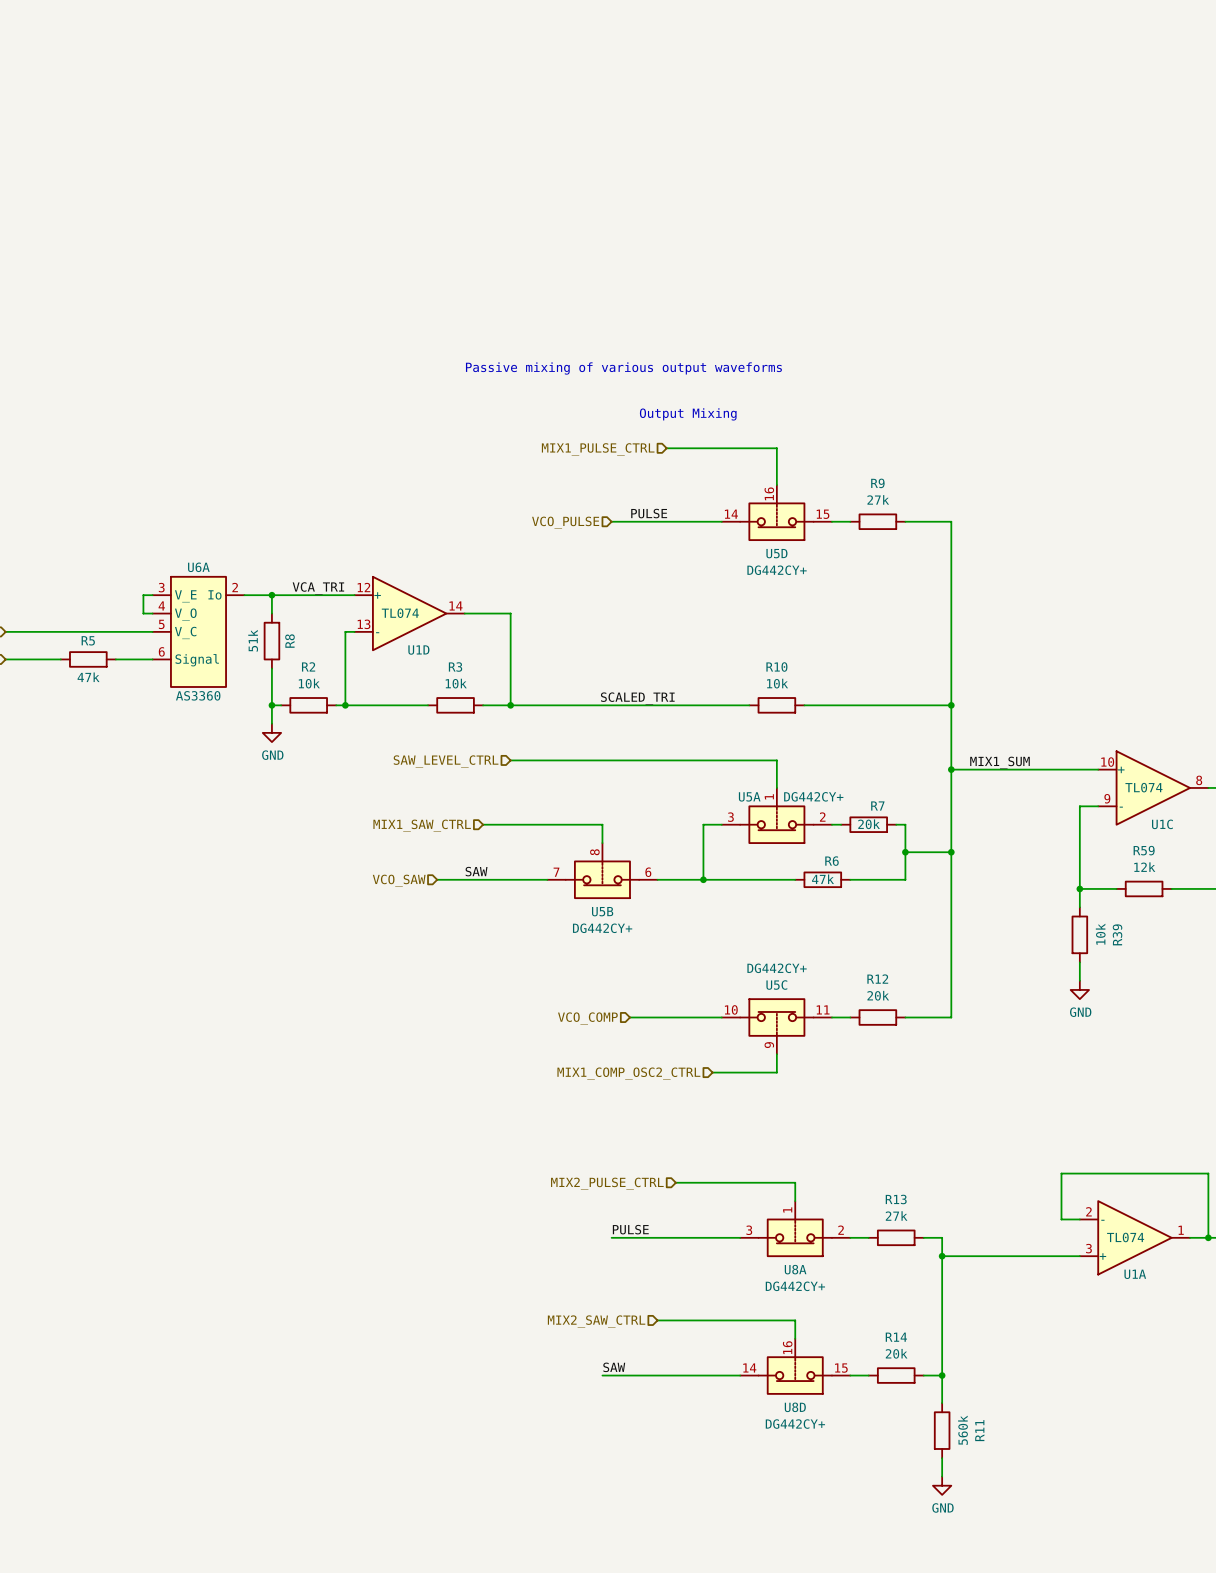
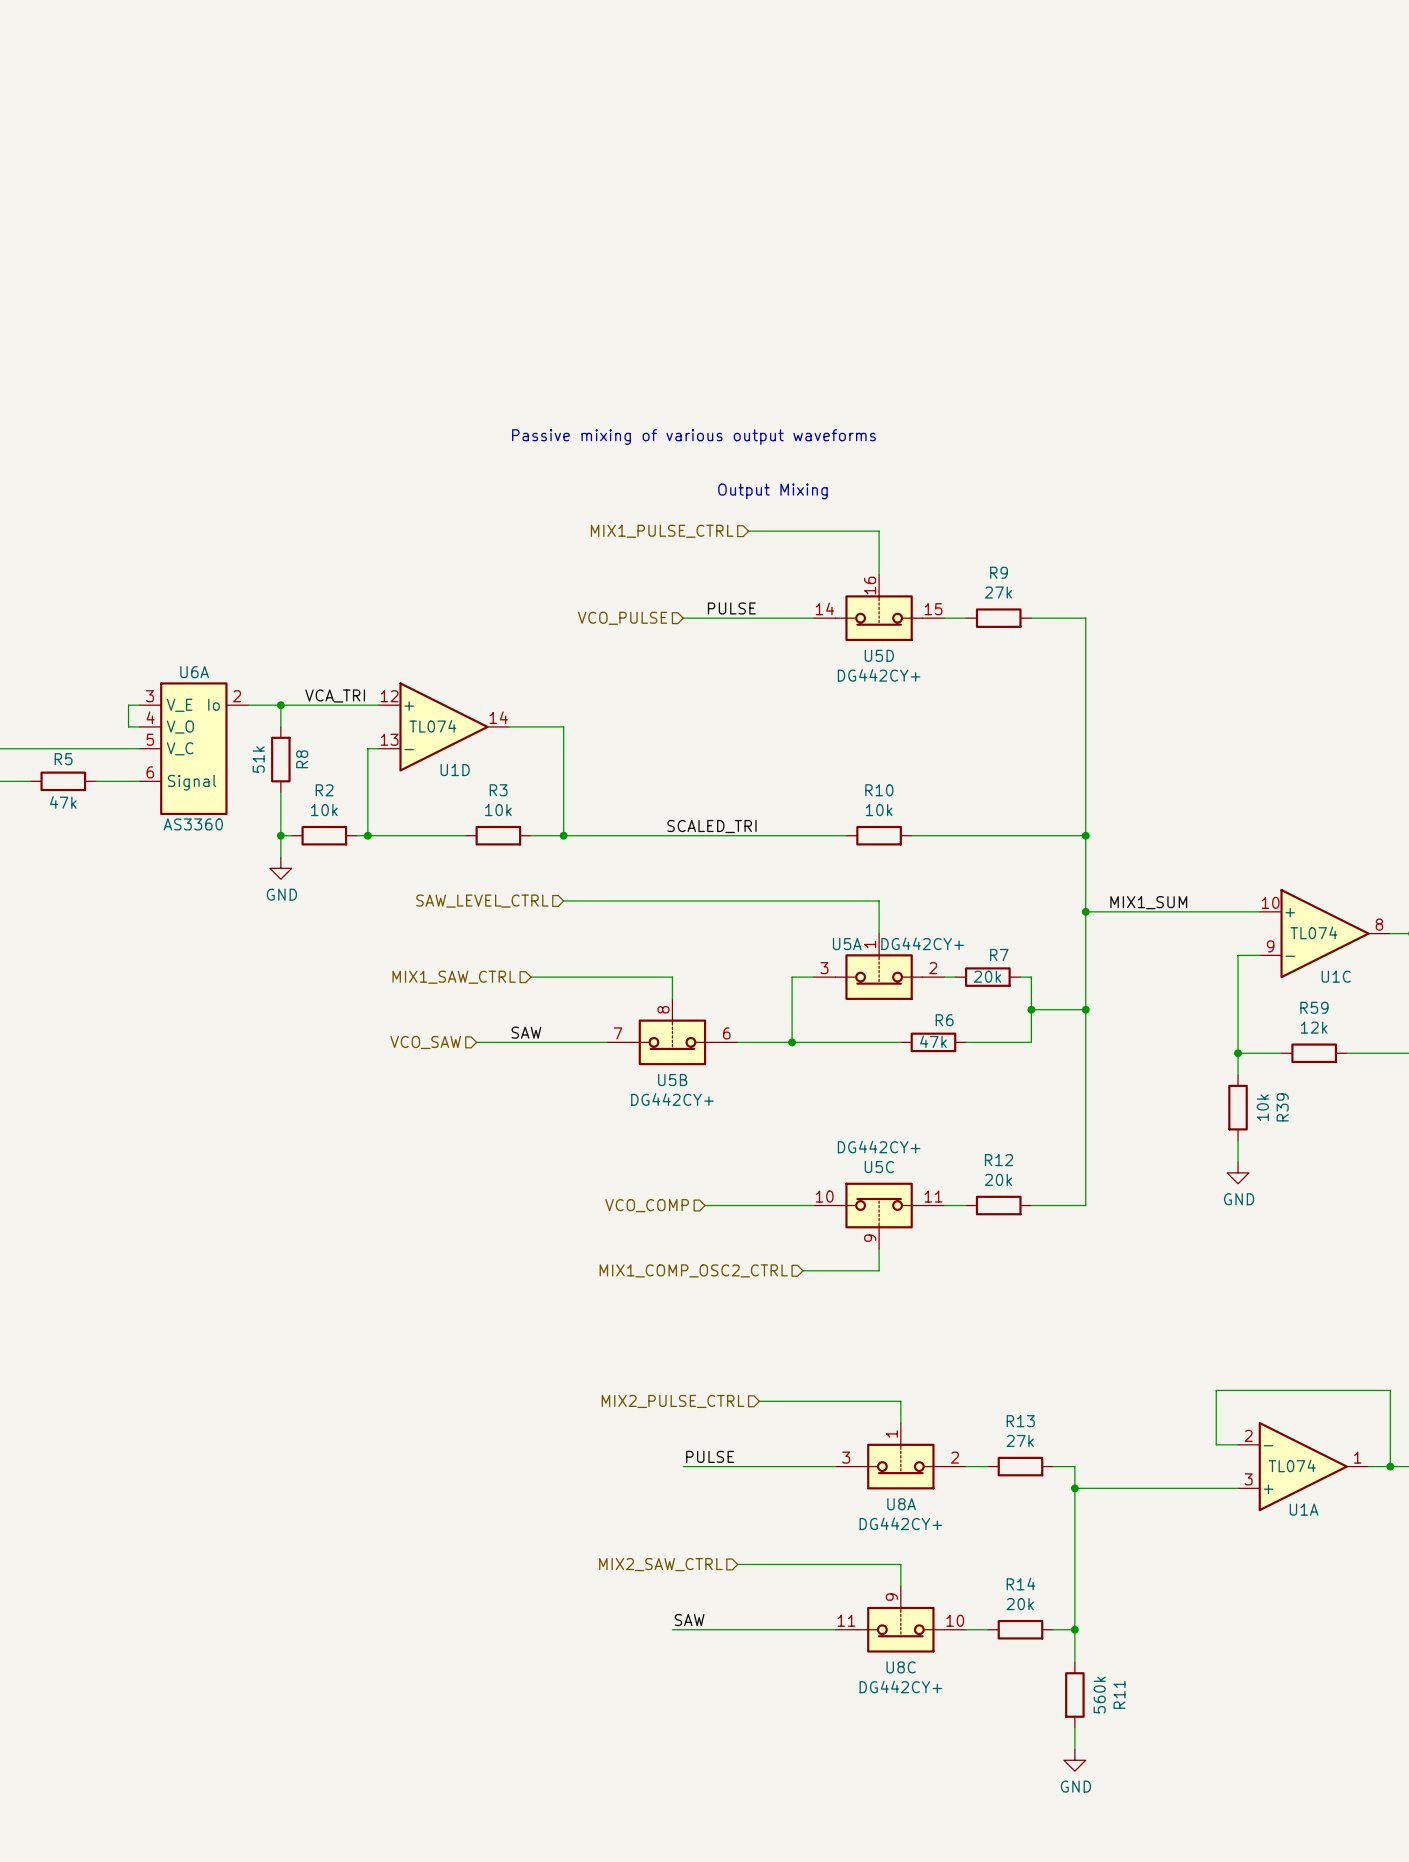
U8D pin number: 16 (787, 1347) -> 9 (891, 1597)
U8D pin number: 14 (749, 1367) -> 11 (846, 1620)
U8D pin number: 15 (841, 1368) -> 10 (955, 1620)
U8D name: U8D (795, 1407) -> U8C (901, 1667)

